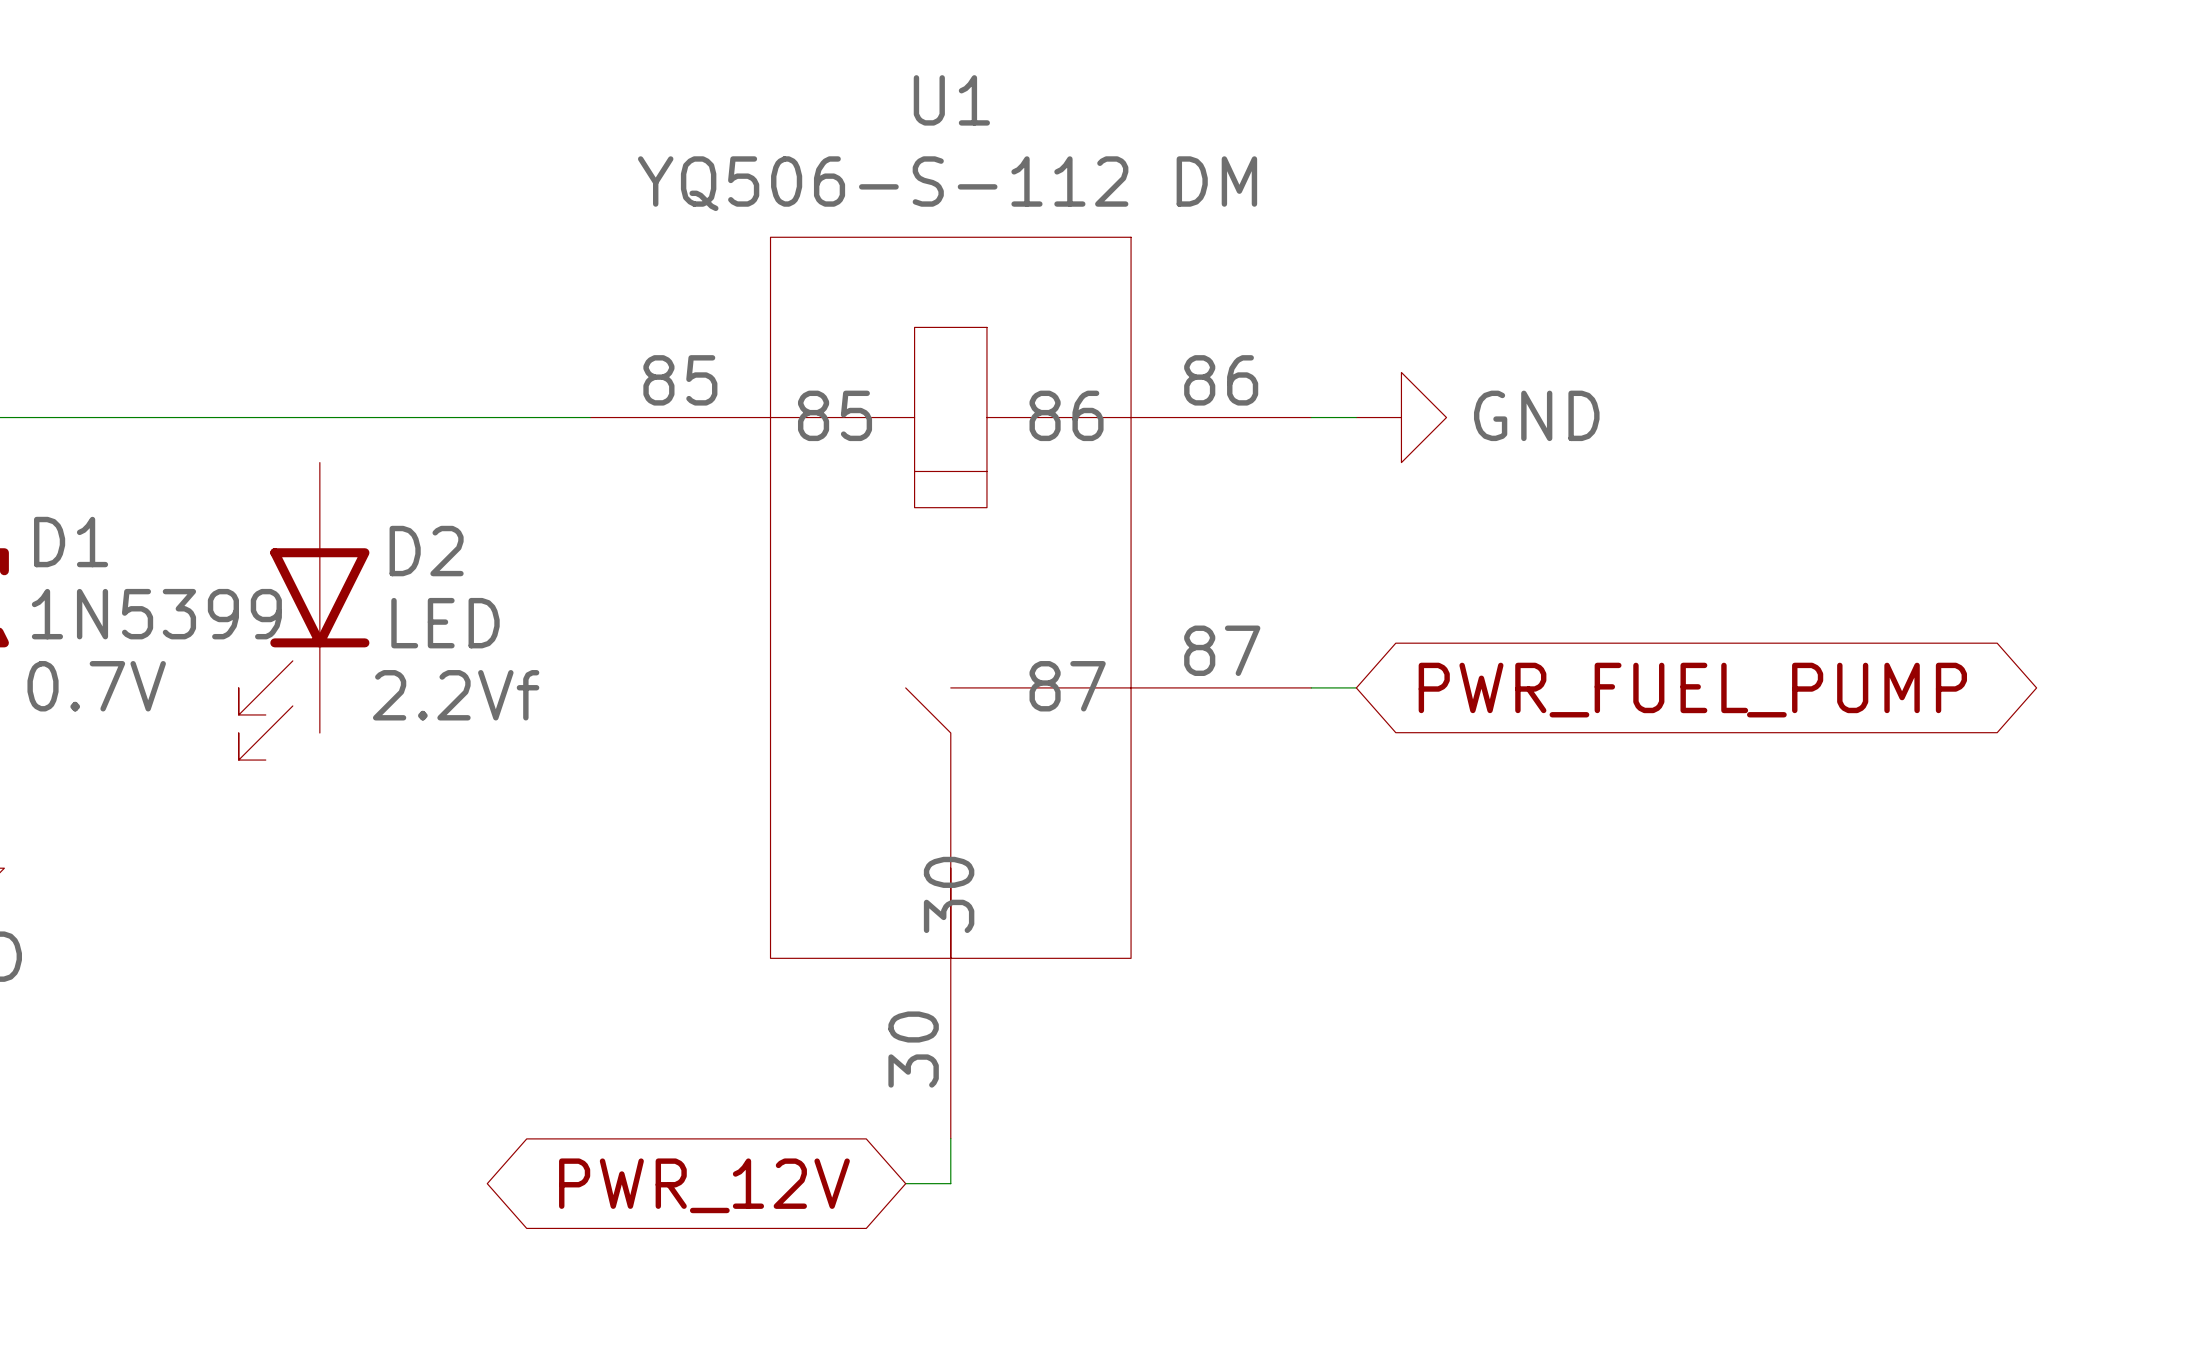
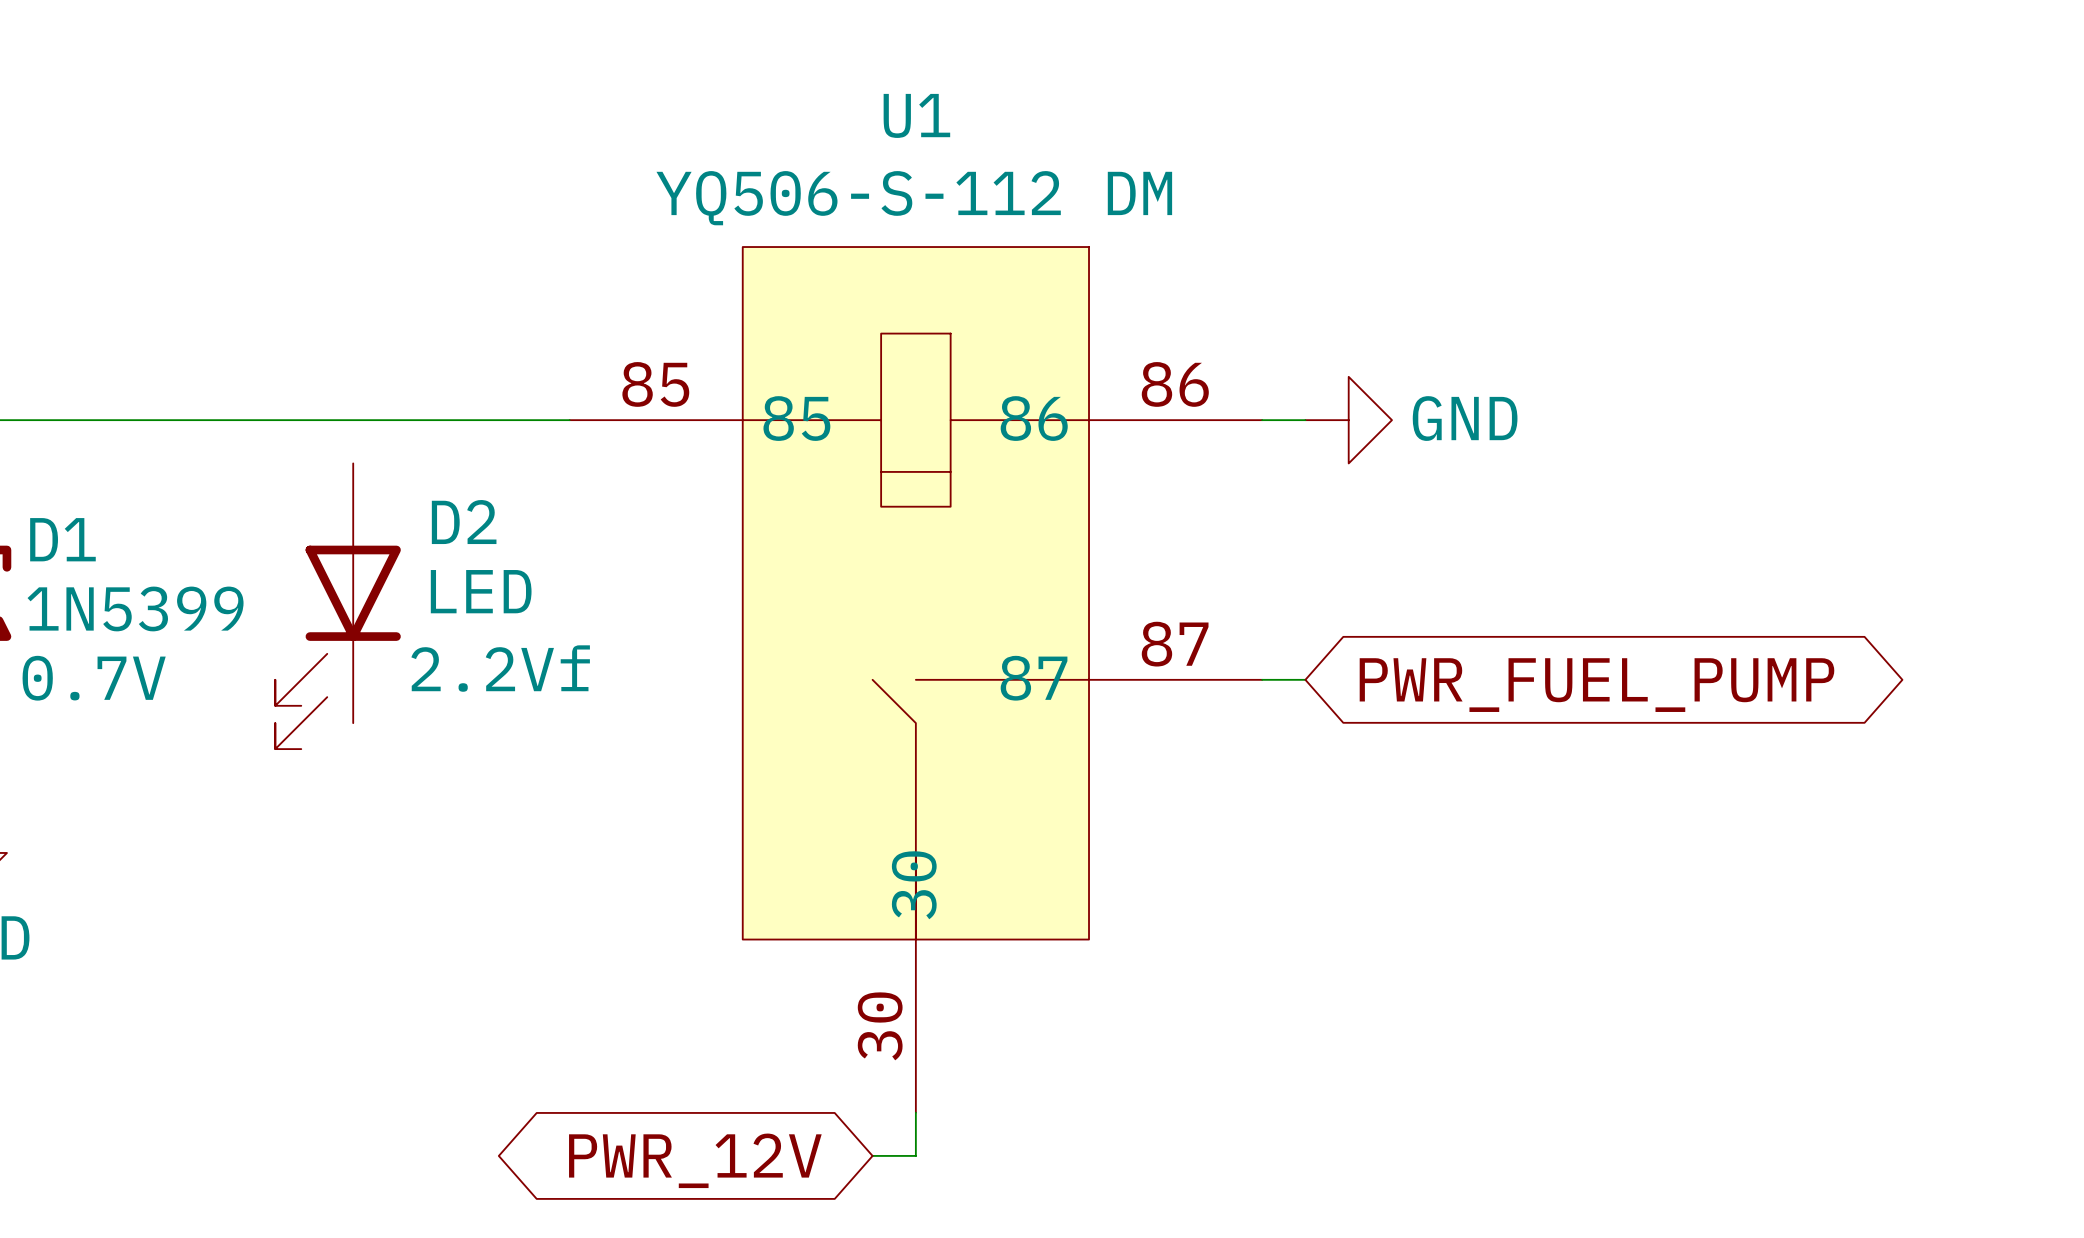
D2 name position: D2 (426, 551) -> D2 (464, 522)
D2 position: (304, 611) -> (338, 606)
D2 value position: LED (445, 623) -> LED (481, 591)
D2 text position: 2.2Vf (456, 695) -> 2.2Vf (500, 668)

